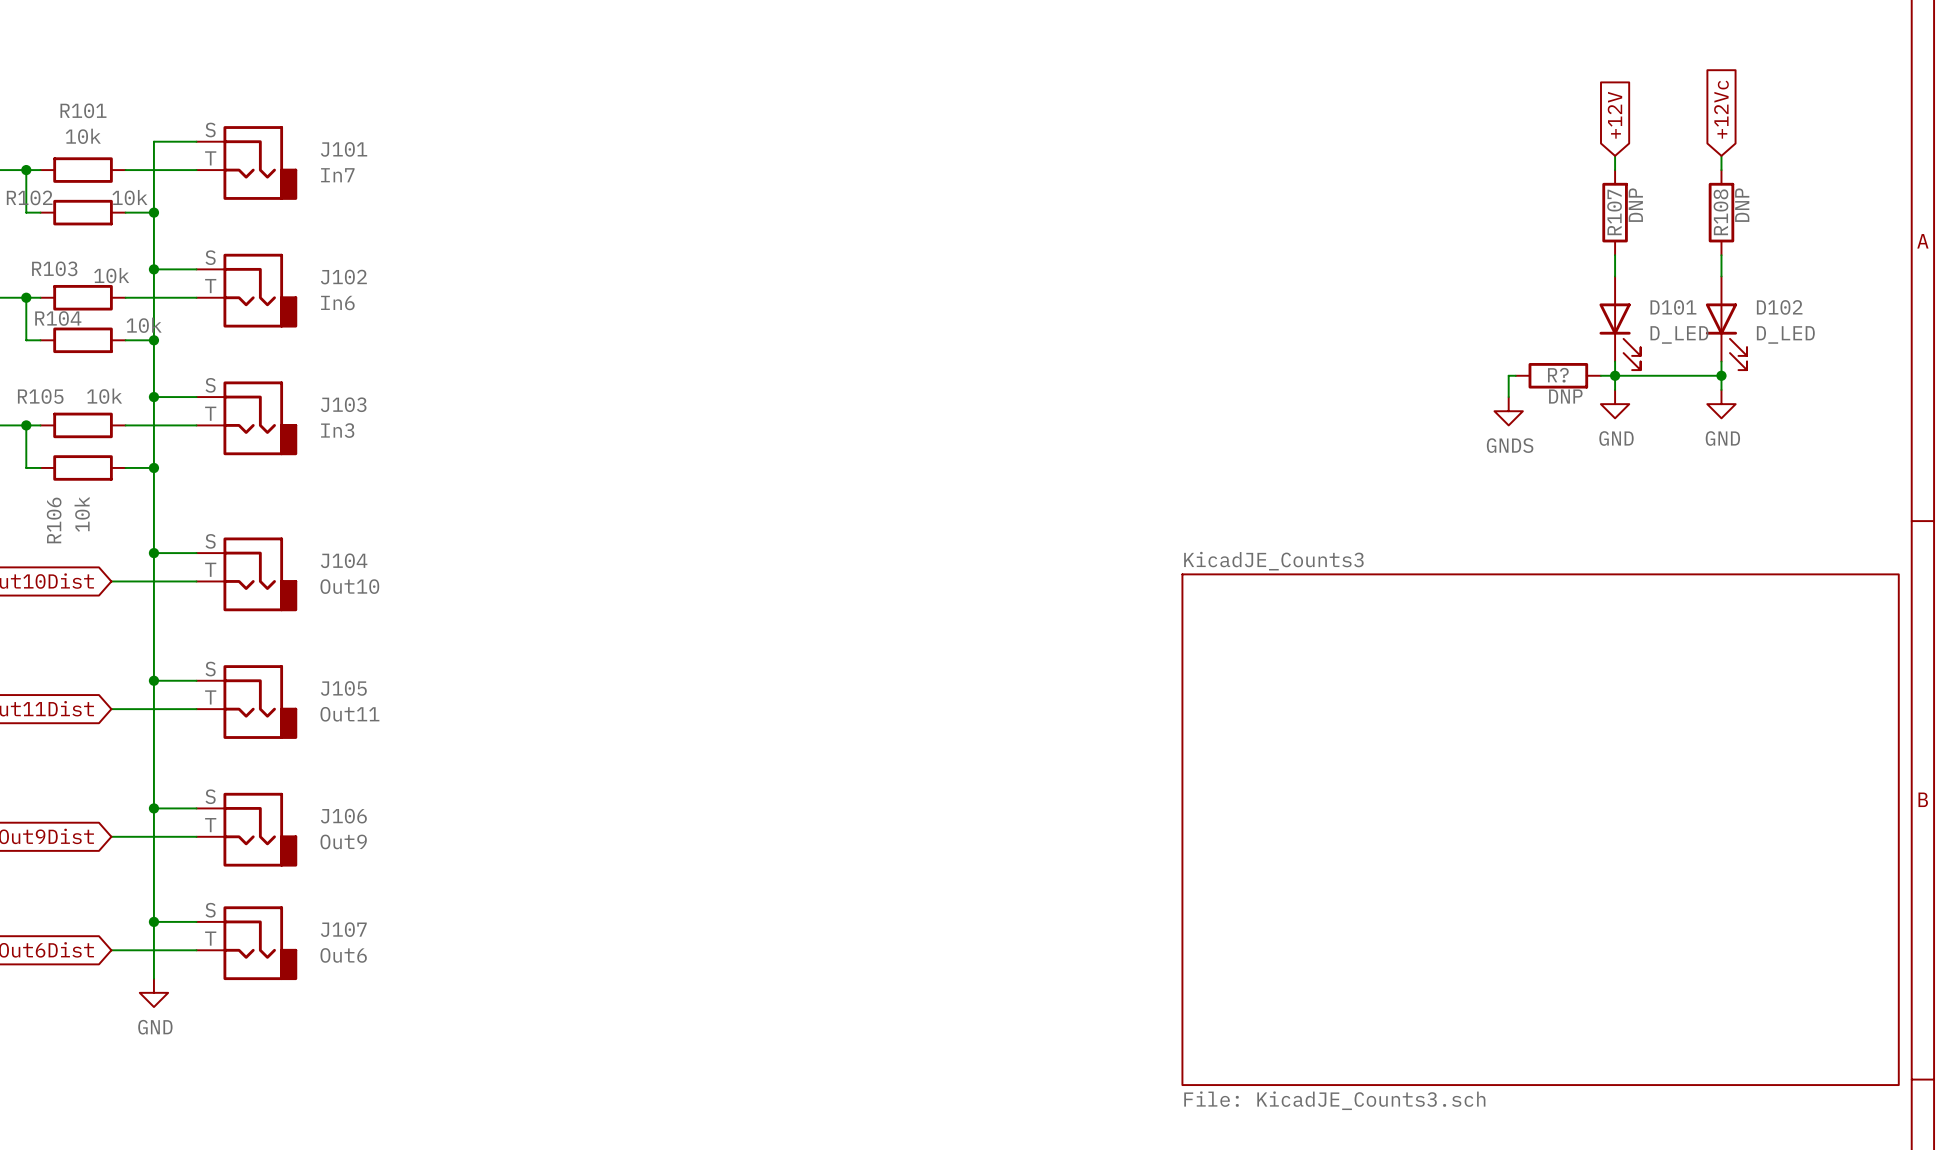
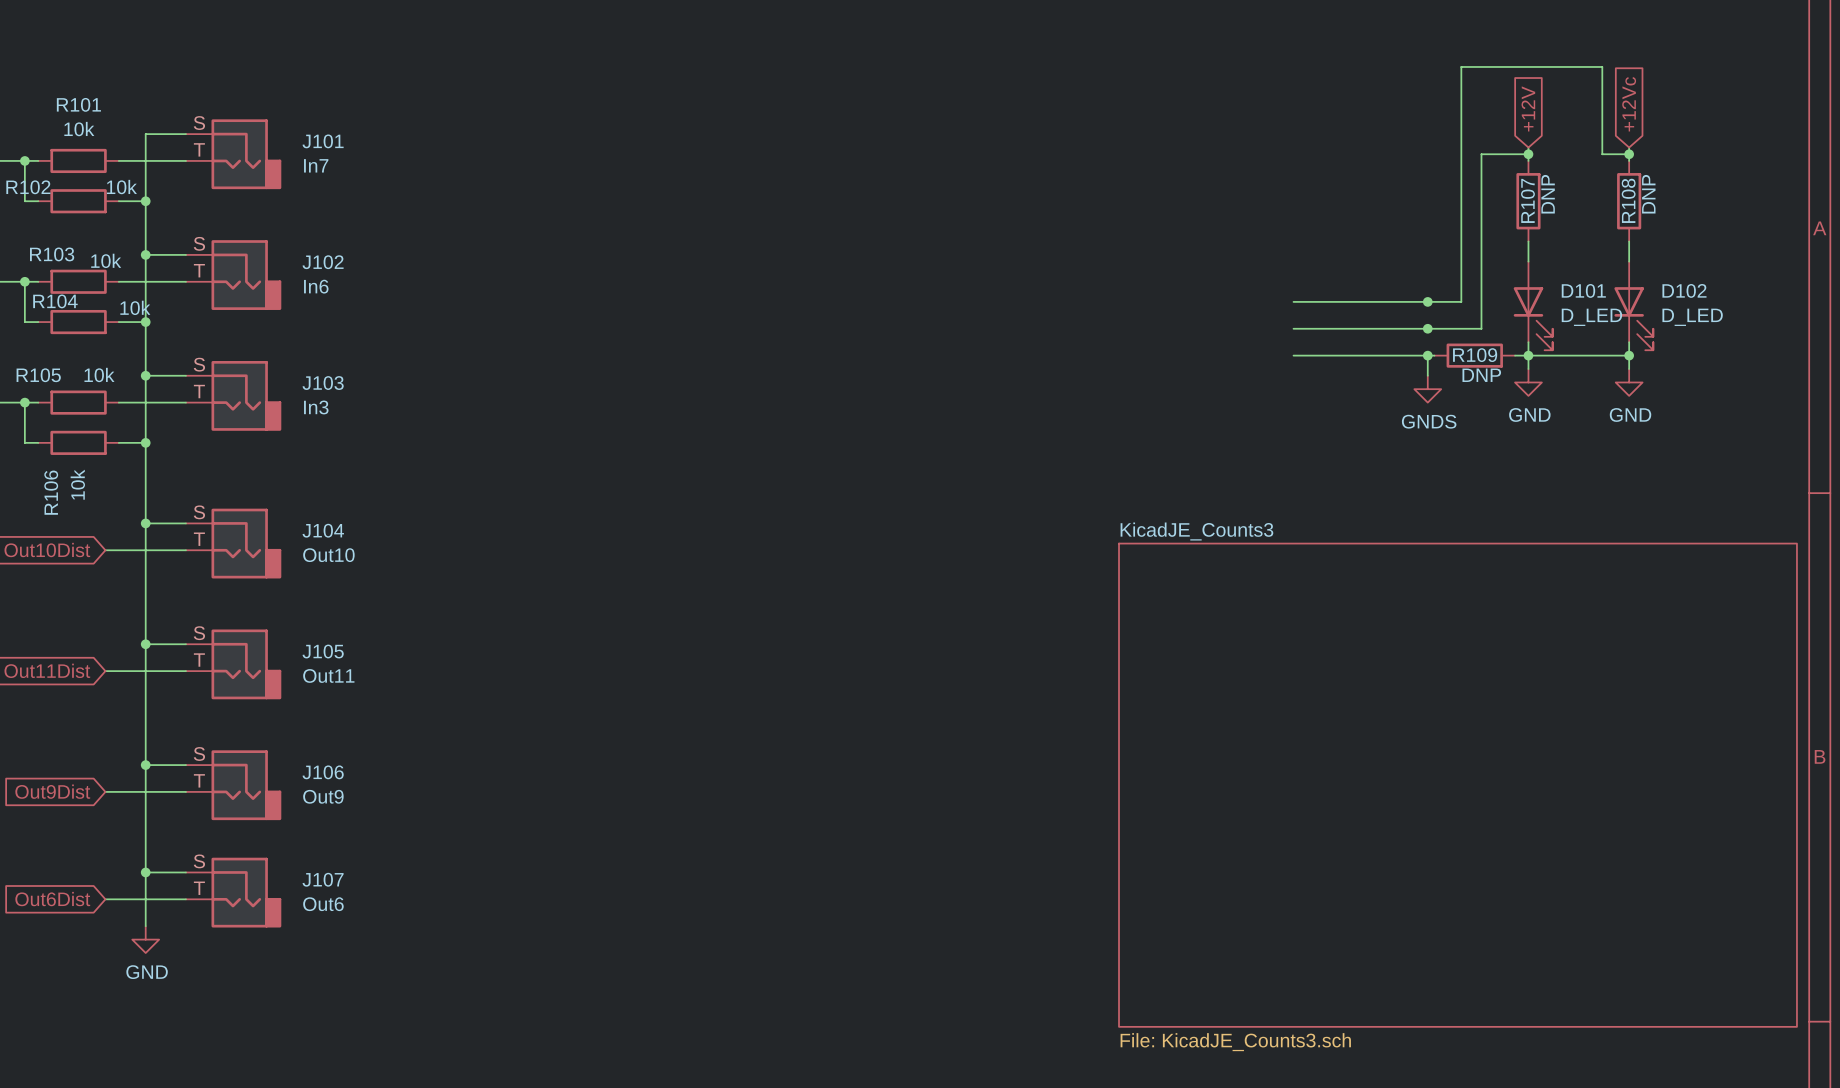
wire: none -> (1528, 154) (1481, 154) (1481, 328) (1293, 328)
junction: none -> (1528, 154)
wire: none -> (1629, 154) (1602, 154) (1602, 66) (1461, 66) (1461, 301) (1293, 301)
junction: none -> (1629, 154)
junction: none -> (1427, 301)
junction: none -> (1427, 328)
wire: none -> (1293, 355) (1427, 355)
junction: none -> (1427, 355)
R? name: R? (1558, 375) -> R109 (1475, 355)

